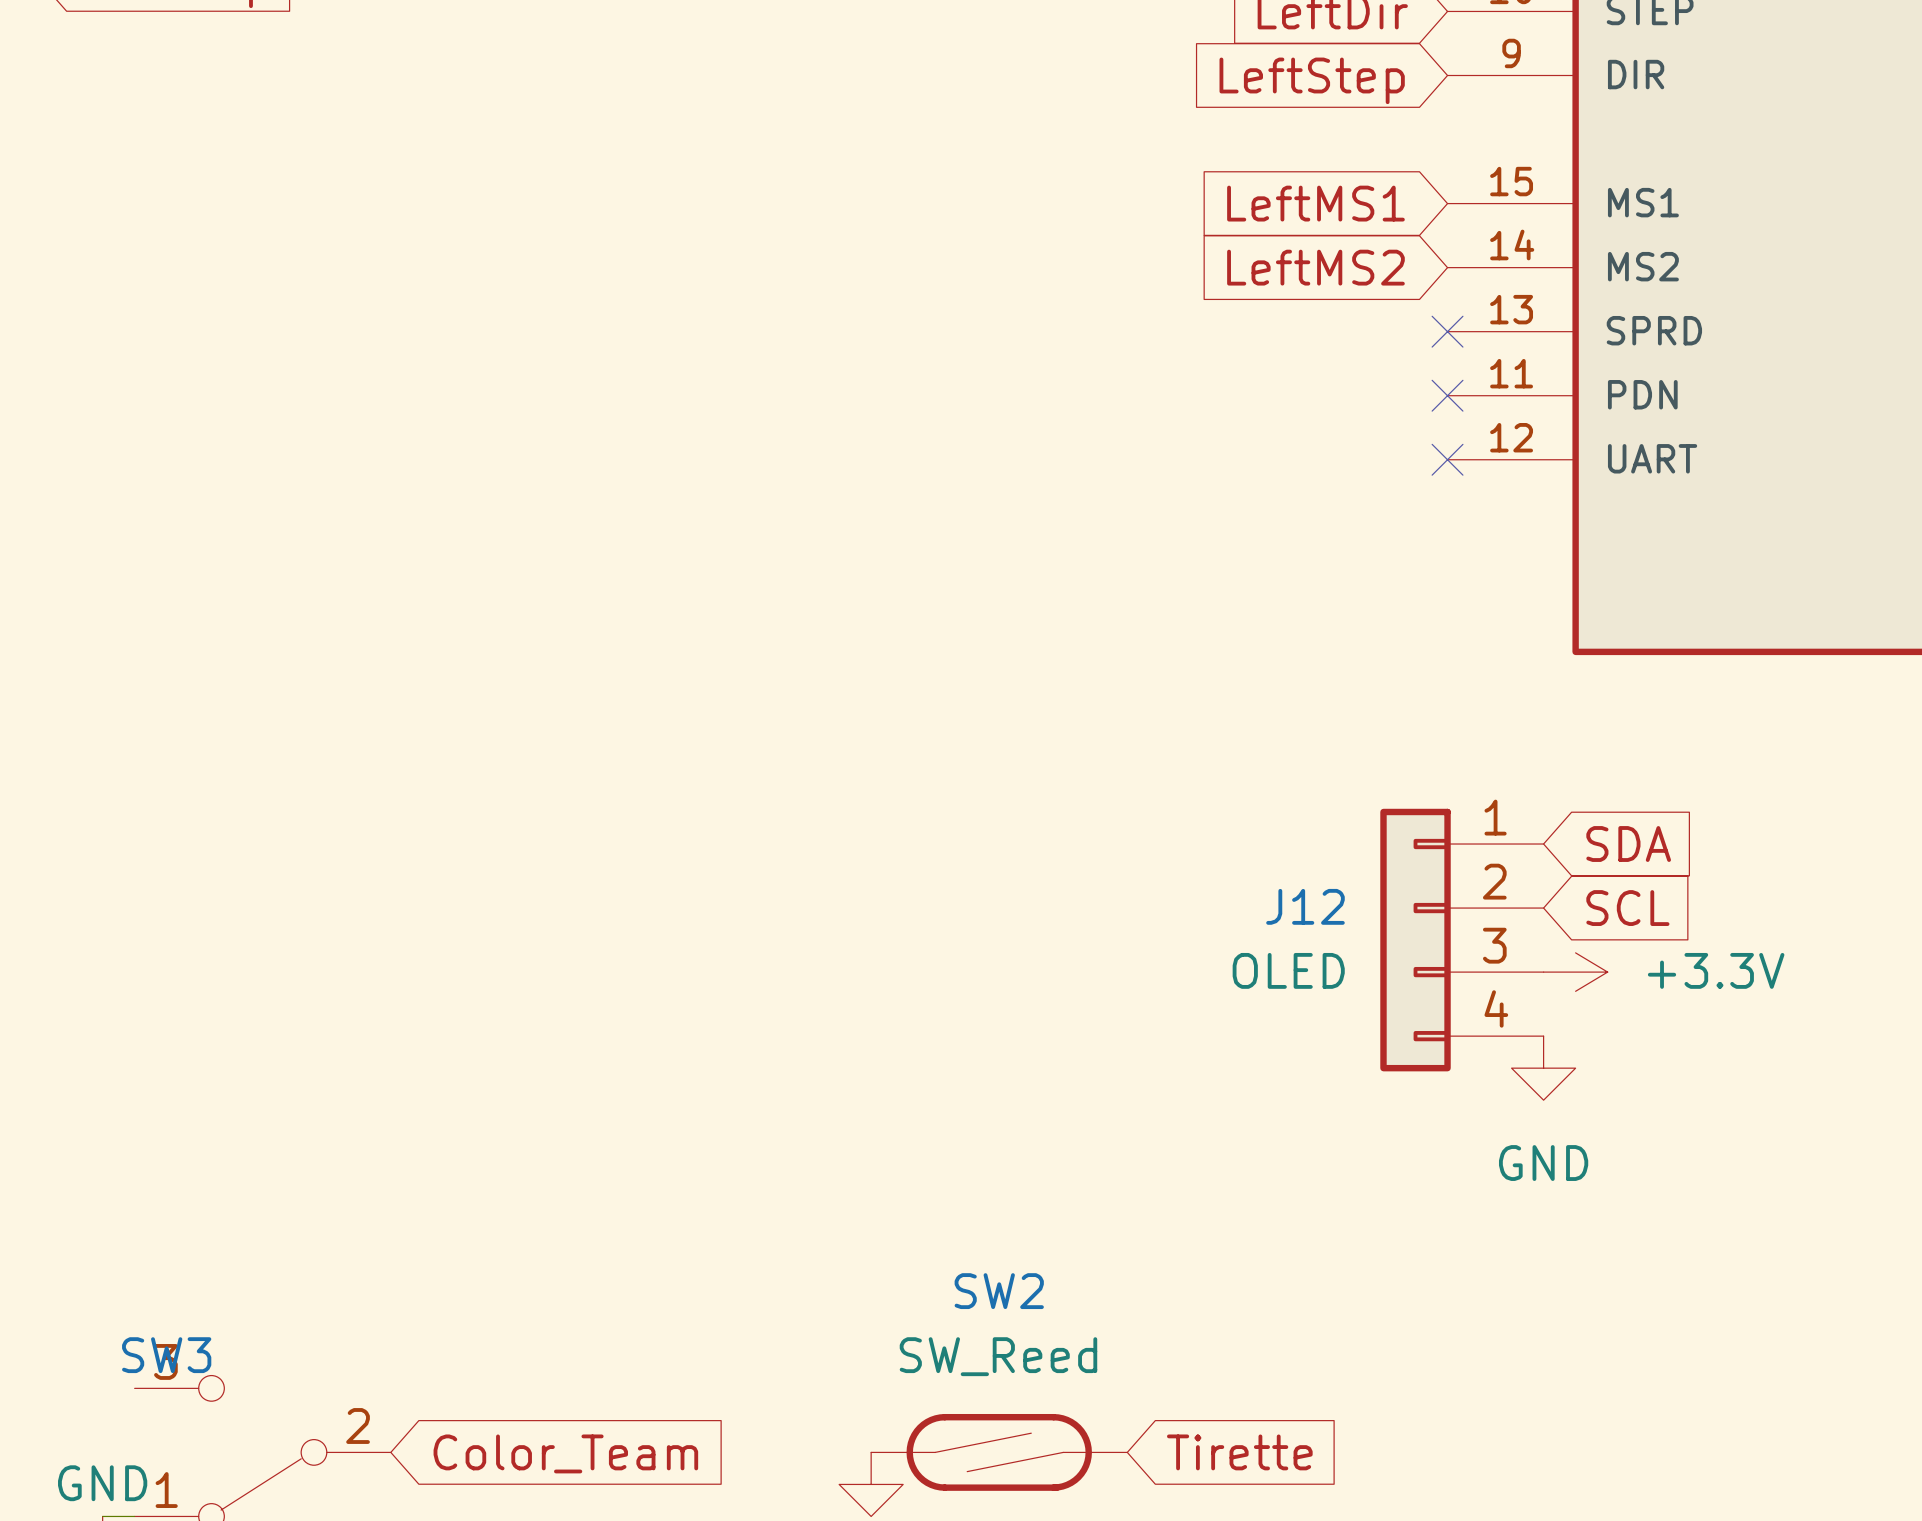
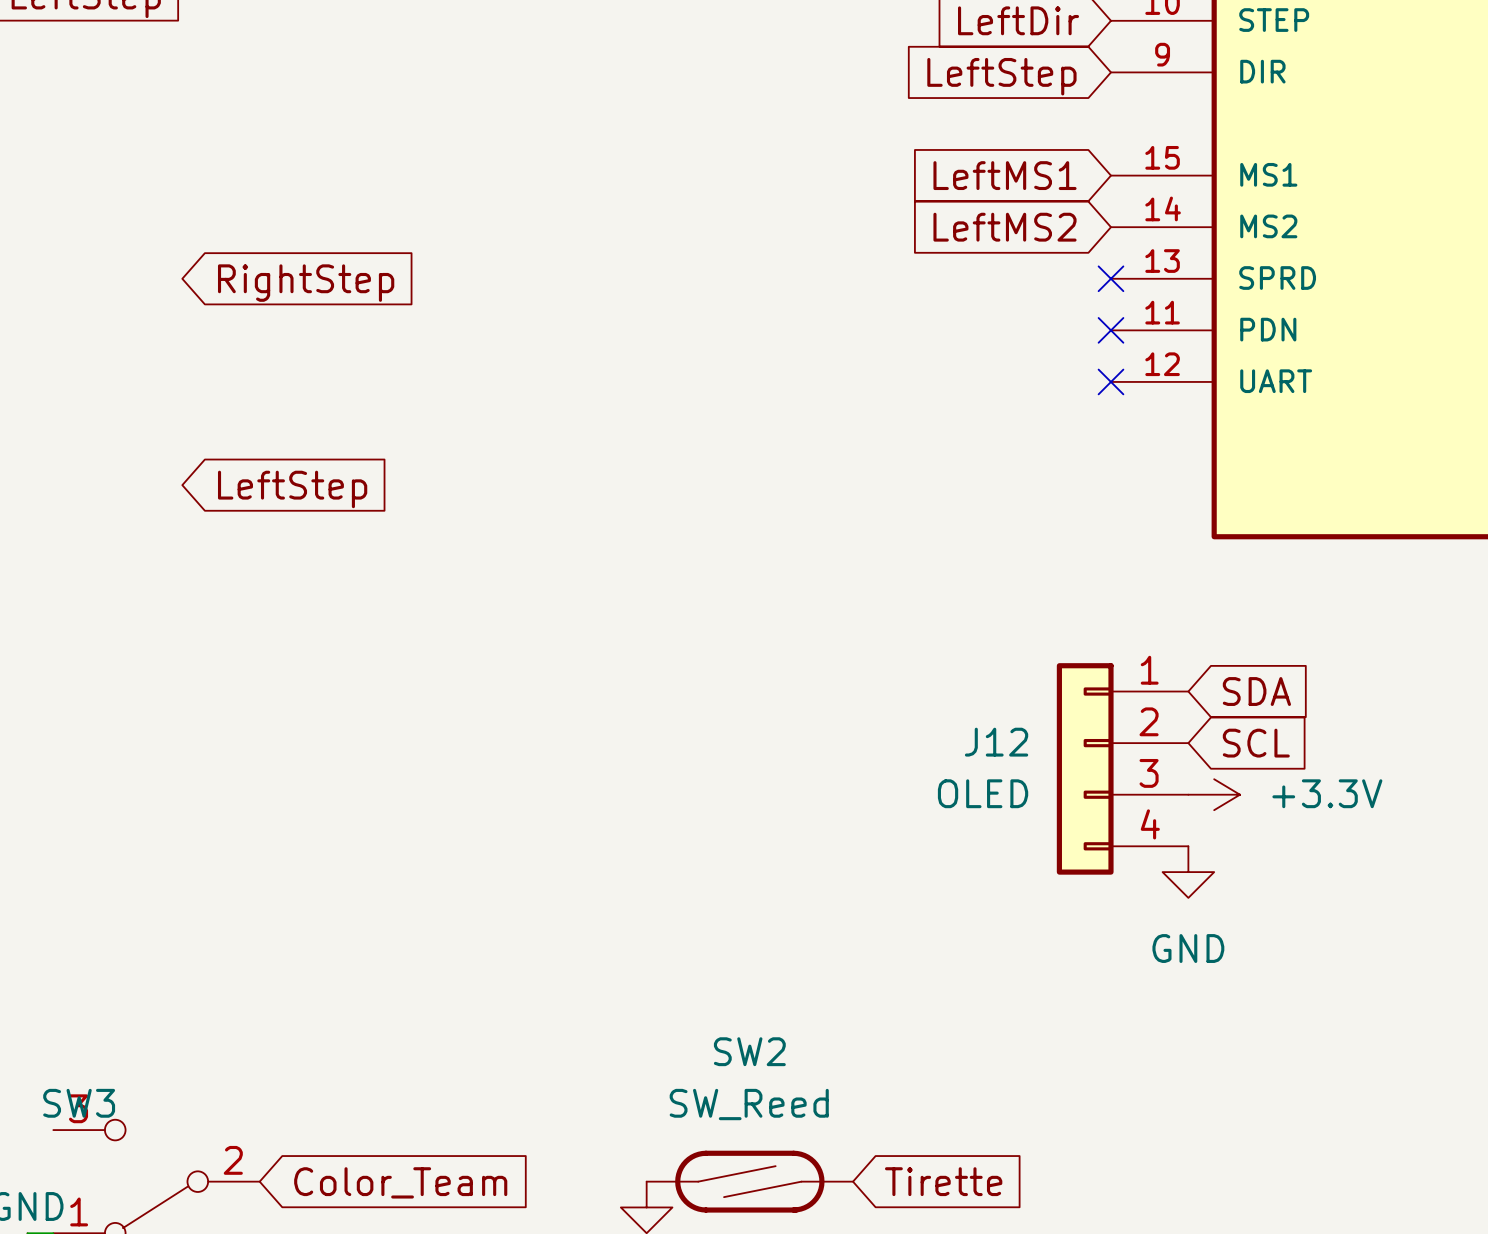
global label: none -> RightStep (306, 283)
global label: none -> LeftStep (292, 489)

